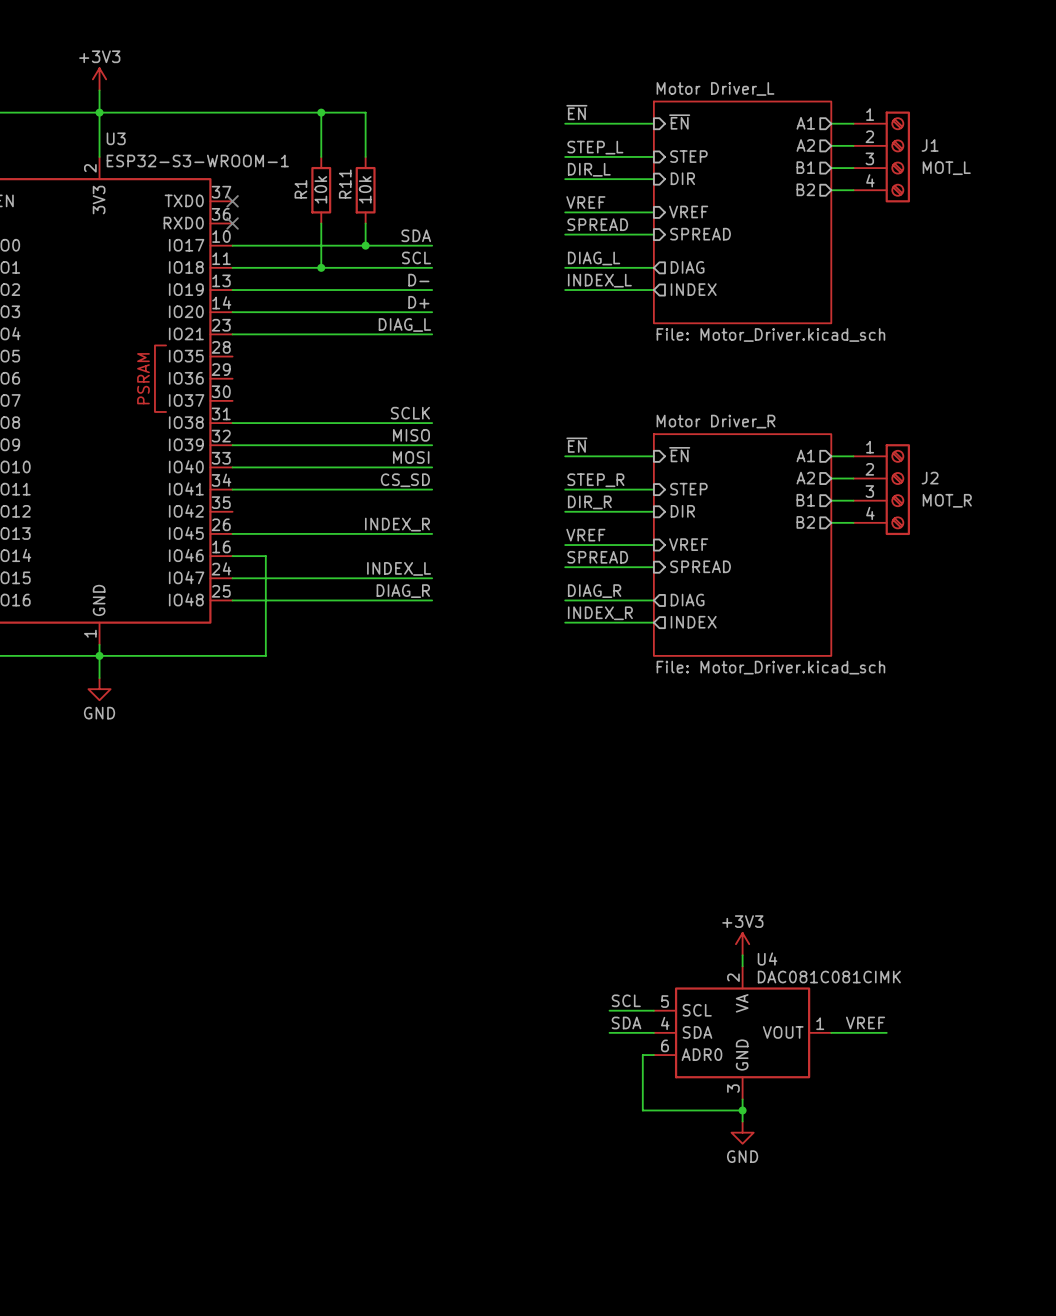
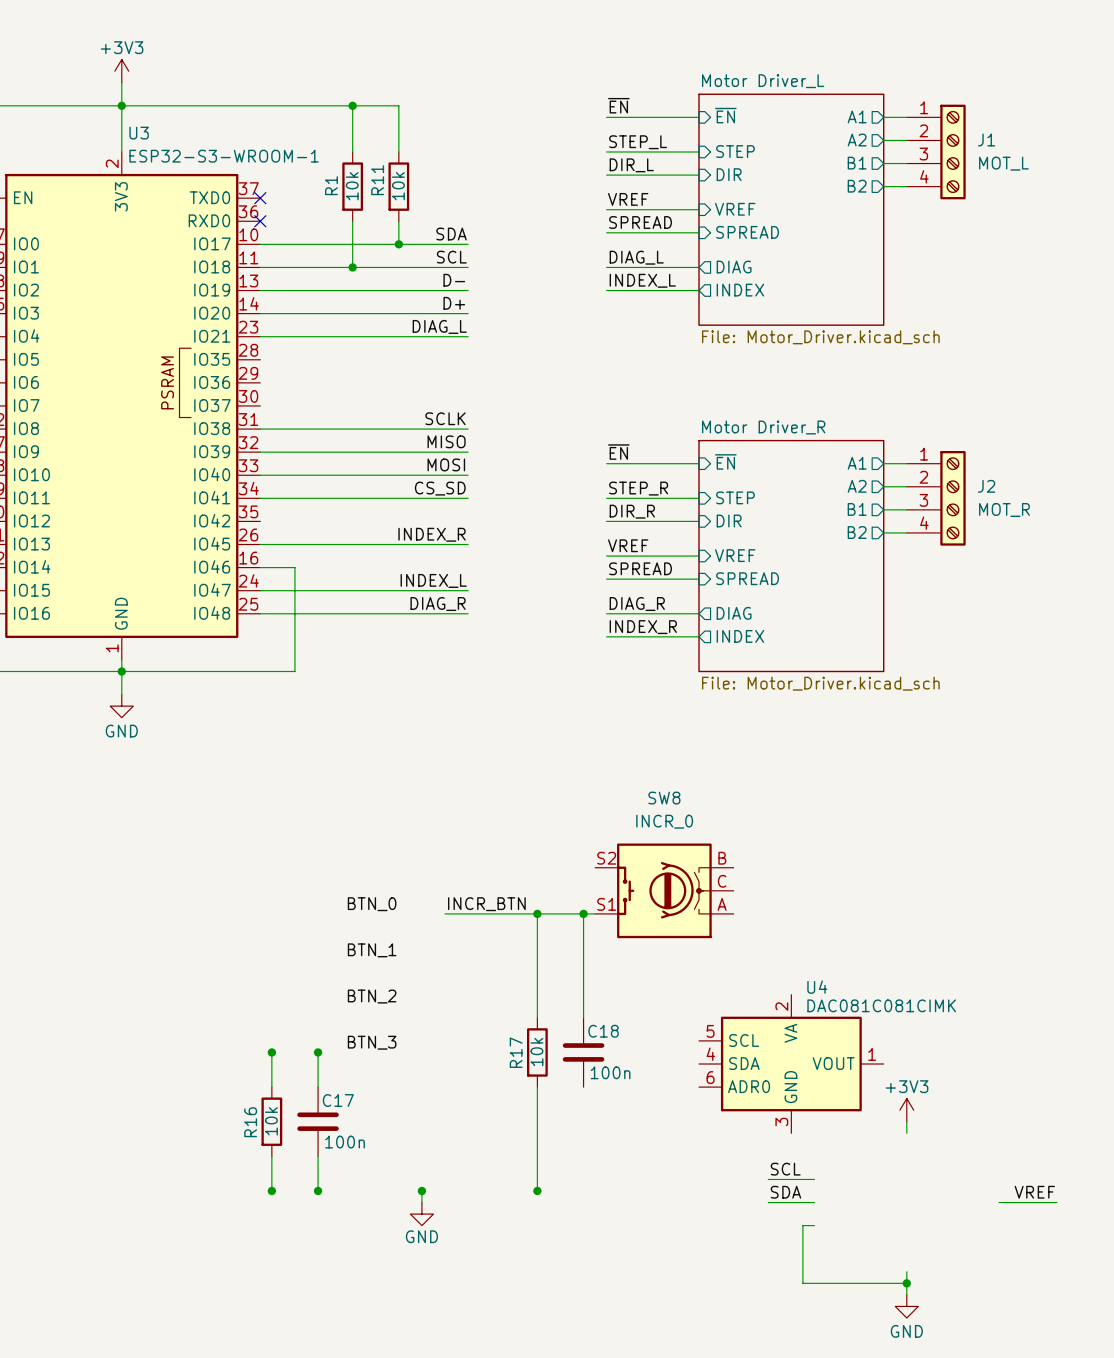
SW8: none -> INCR_0 (664, 890)
label: none -> BTN_0 (372, 904)
label: none -> INCR_BTN (486, 904)
wire: none -> (445, 913) (595, 913)
wire: none -> (537, 913) (537, 1017)
junction: none -> (537, 913)
wire: none -> (583, 913) (583, 1017)
junction: none -> (583, 913)
label: none -> BTN_1 (372, 950)
power symbol position: +3V3 (742, 944) -> +3V3 (906, 1110)
wire: (742, 955) (742, 966) -> (906, 1121) (906, 1133)
label: none -> BTN_2 (372, 996)
label position: SCL (626, 1000) -> SCL (785, 1169)
wire: (609, 1010) (653, 1010) -> (768, 1179) (814, 1179)
label: none -> BTN_3 (372, 1042)
wire: none -> (271, 1052) (271, 1087)
junction: none -> (271, 1052)
wire: none -> (318, 1052) (318, 1087)
junction: none -> (318, 1052)
R17: none -> 10k (537, 1052)
C18: none -> 100n (583, 1052)
label position: SDA (626, 1022) -> SDA (785, 1192)
label position: VREF (865, 1022) -> VREF (1034, 1192)
wire: (609, 1032) (653, 1032) -> (768, 1202) (814, 1202)
wire: (831, 1032) (886, 1032) -> (999, 1202) (1056, 1202)
wire: none -> (537, 1087) (537, 1190)
wire: (653, 1055) (642, 1055) (642, 1110) (742, 1110) -> (814, 1225) (802, 1225) (802, 1283) (906, 1283)
R16: none -> 10k (271, 1121)
C17: none -> 100n (318, 1121)
wire: (742, 1099) (742, 1121) -> (906, 1271) (906, 1294)
junction: (742, 1110) -> none
wire: none -> (271, 1156) (271, 1190)
wire: none -> (318, 1156) (318, 1190)
power symbol position: GND (742, 1132) -> GND (906, 1306)
junction: none -> (271, 1190)
junction: none -> (318, 1190)
wire: none -> (421, 1190) (421, 1202)
junction: none -> (421, 1190)
junction: none -> (537, 1190)
power symbol: none -> GND (421, 1214)
junction: none -> (906, 1283)

